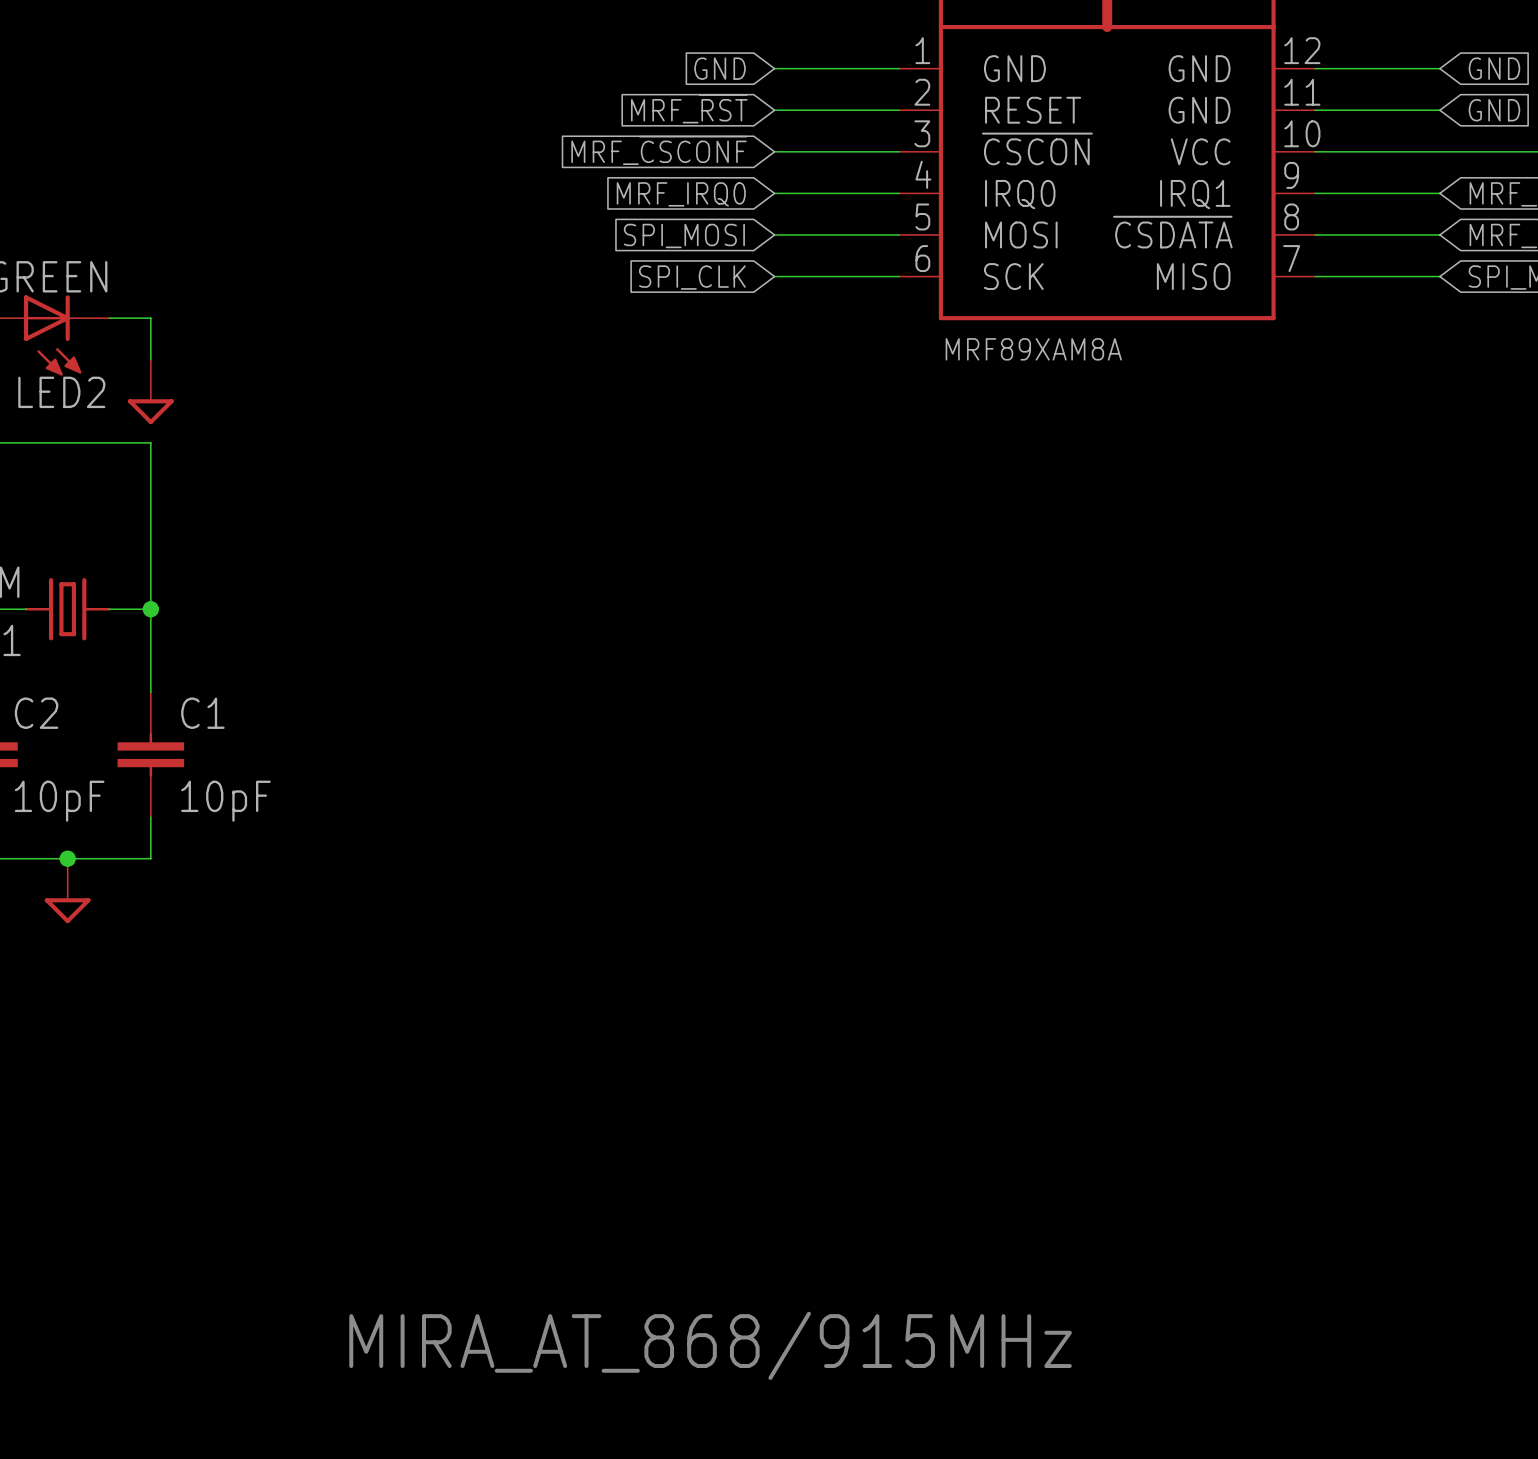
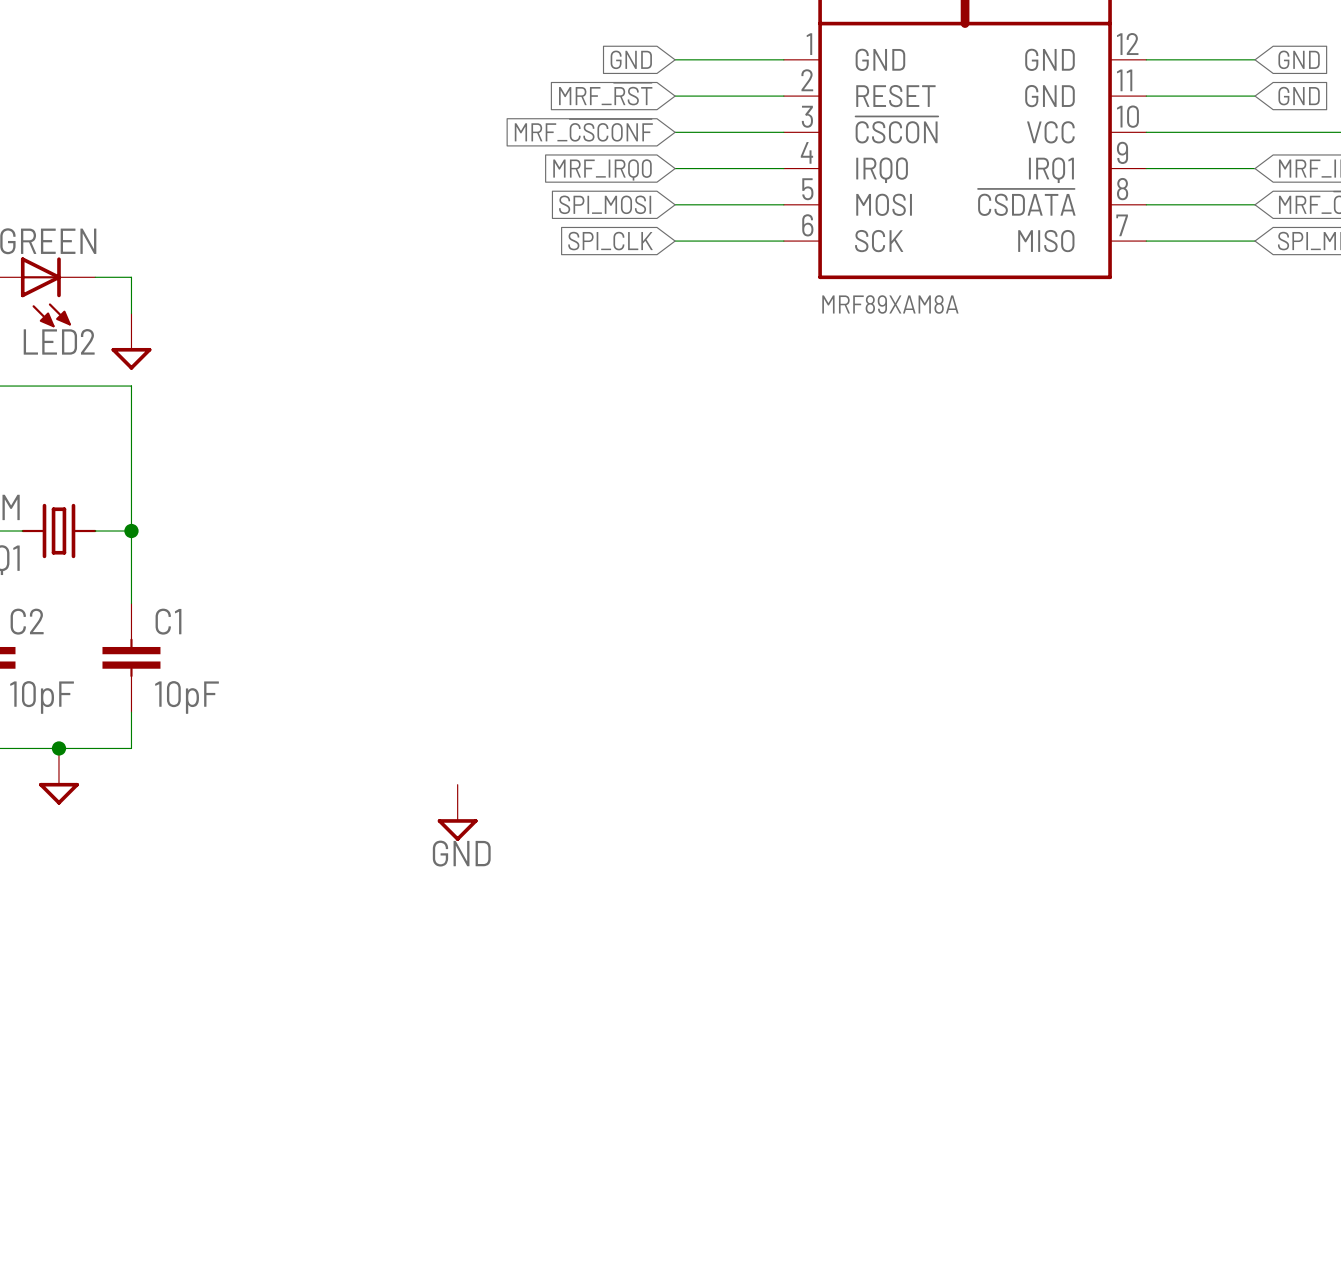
power symbol: none -> GND (457, 812)
text: MIRA_AT_868/915MHz (710, 1345) -> none

